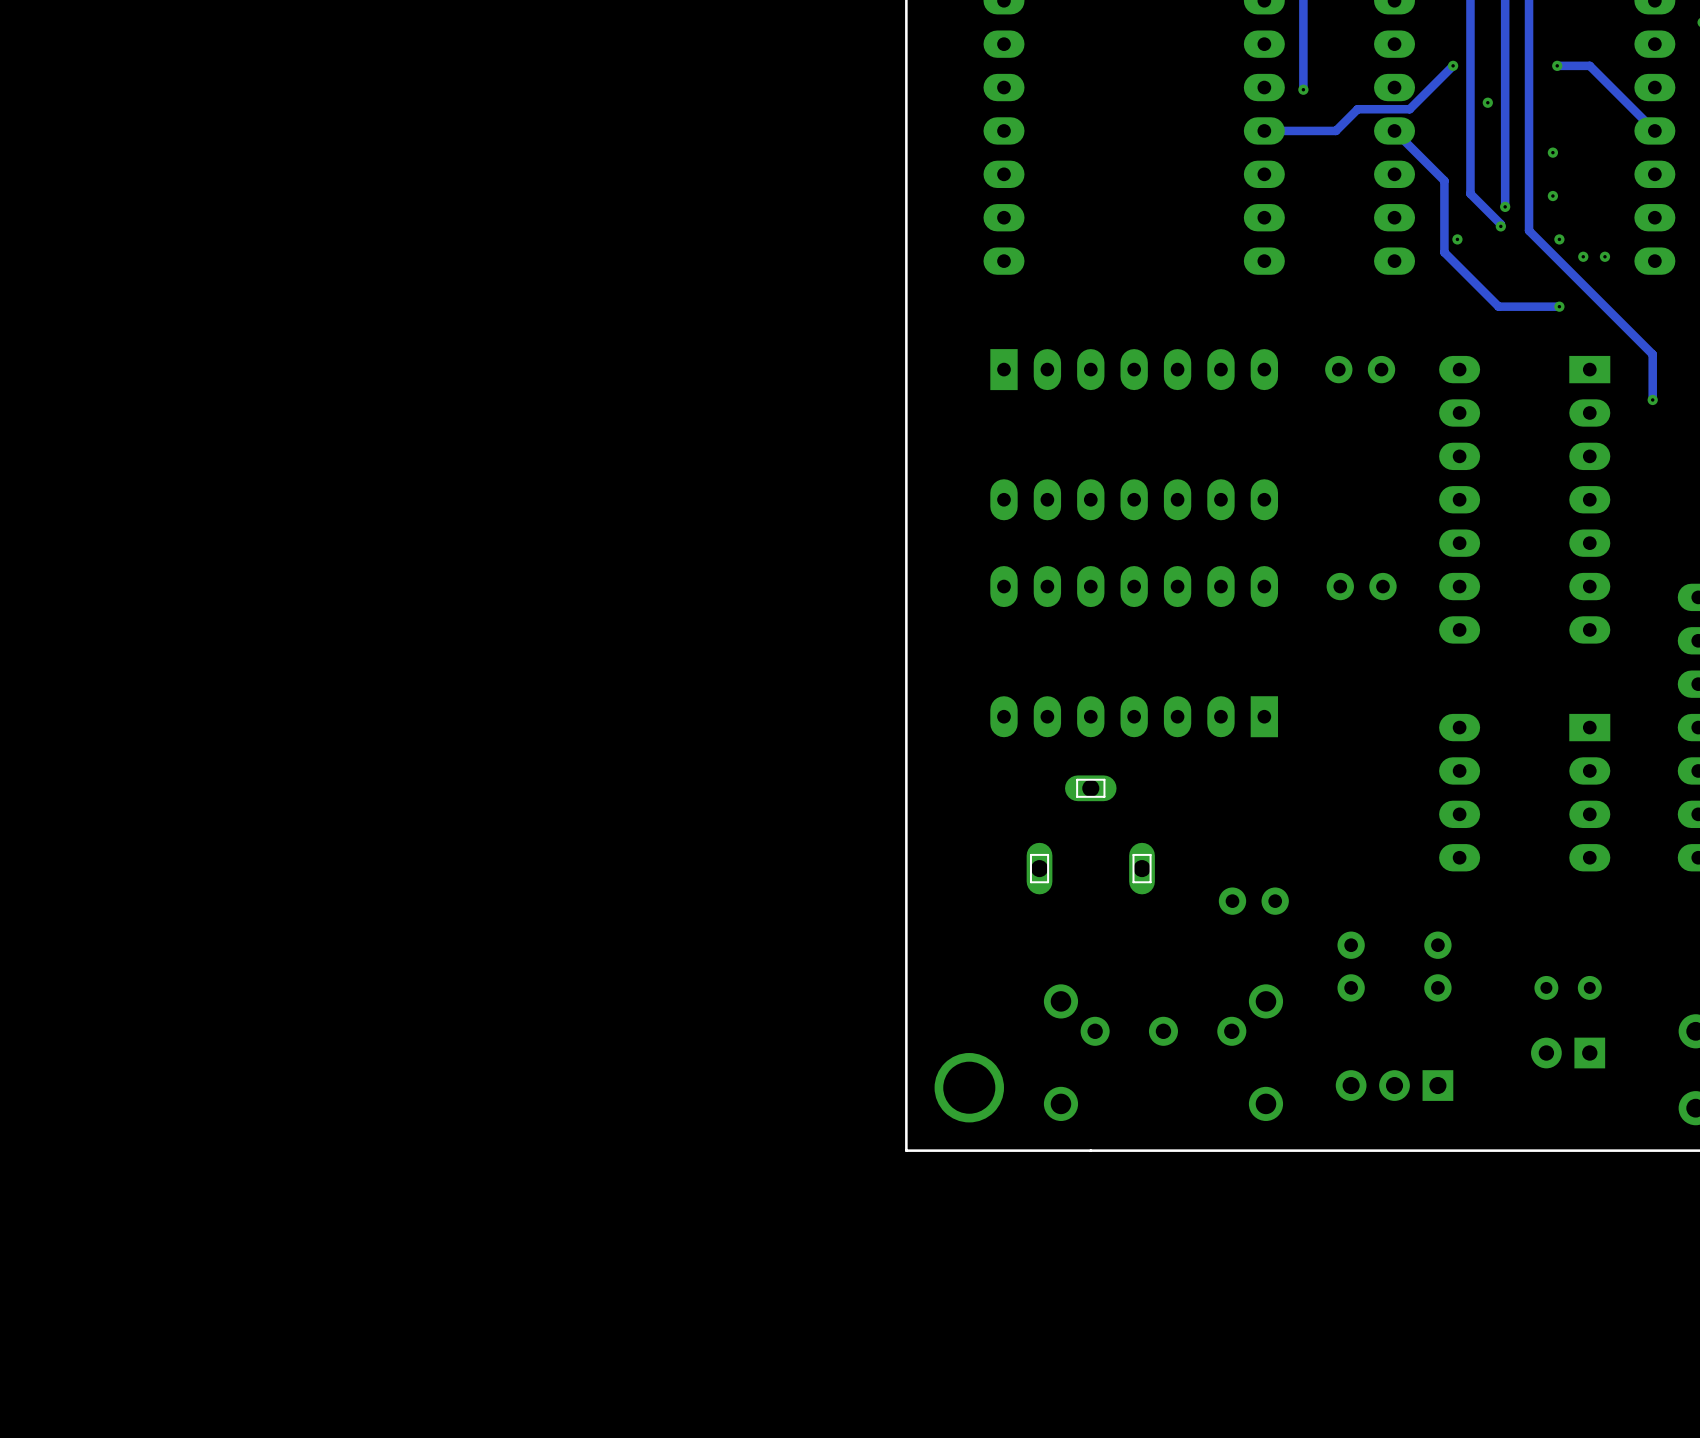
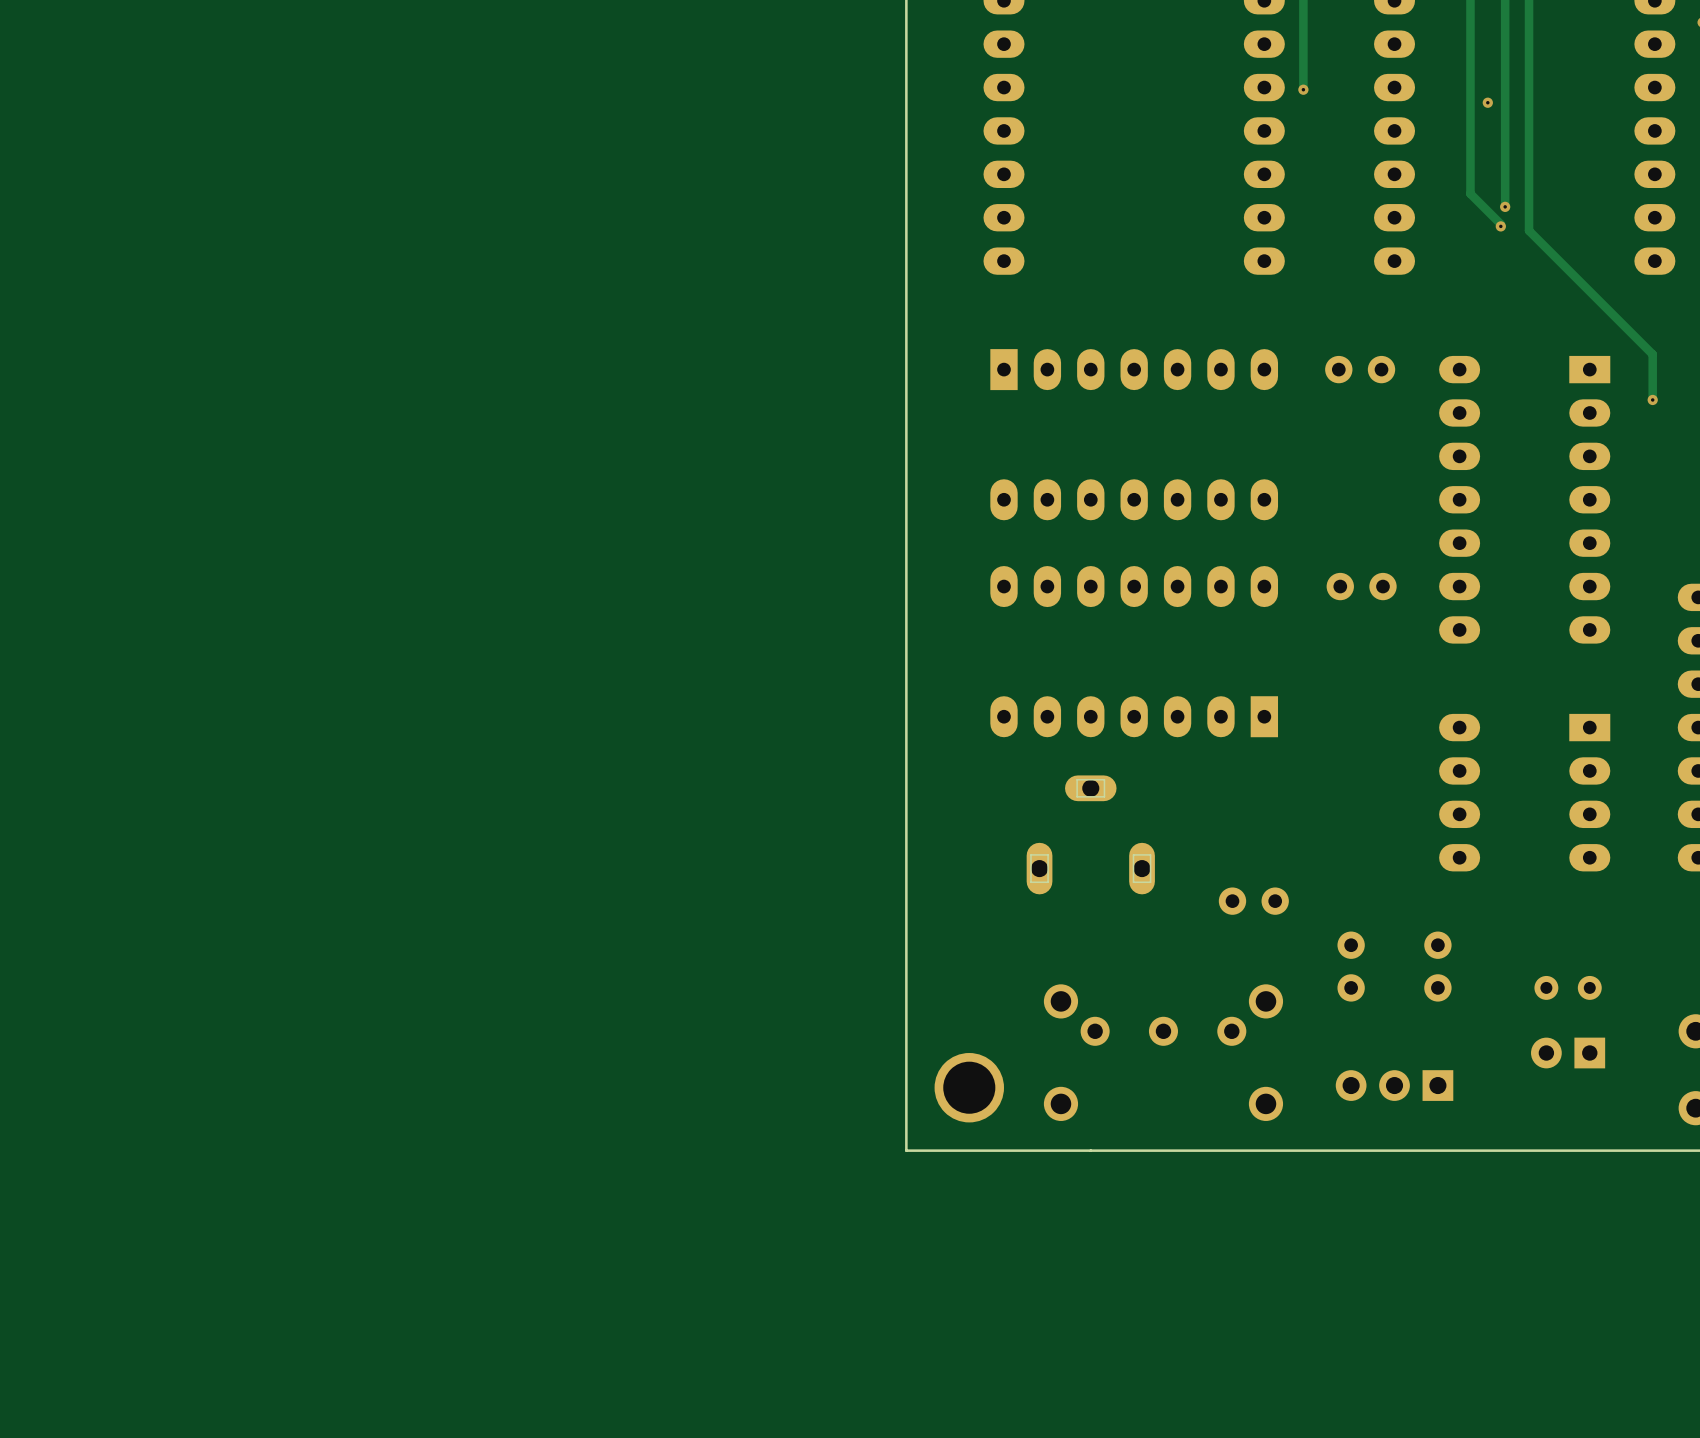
track: (1453, 65) (1409, 109) (1357, 109) (1335, 130) (1264, 130) -> none
via: (1453, 65) -> none
track: (1557, 65) (1589, 65) (1654, 130) -> none
via: (1557, 65) -> none
track: (1394, 130) (1444, 180) (1444, 252) (1498, 306) (1559, 306) -> none
via: (1552, 152) -> none
via: (1552, 196) -> none
via: (1457, 239) -> none
via: (1559, 239) -> none
via: (1583, 256) -> none
via: (1604, 256) -> none
via: (1559, 306) -> none

